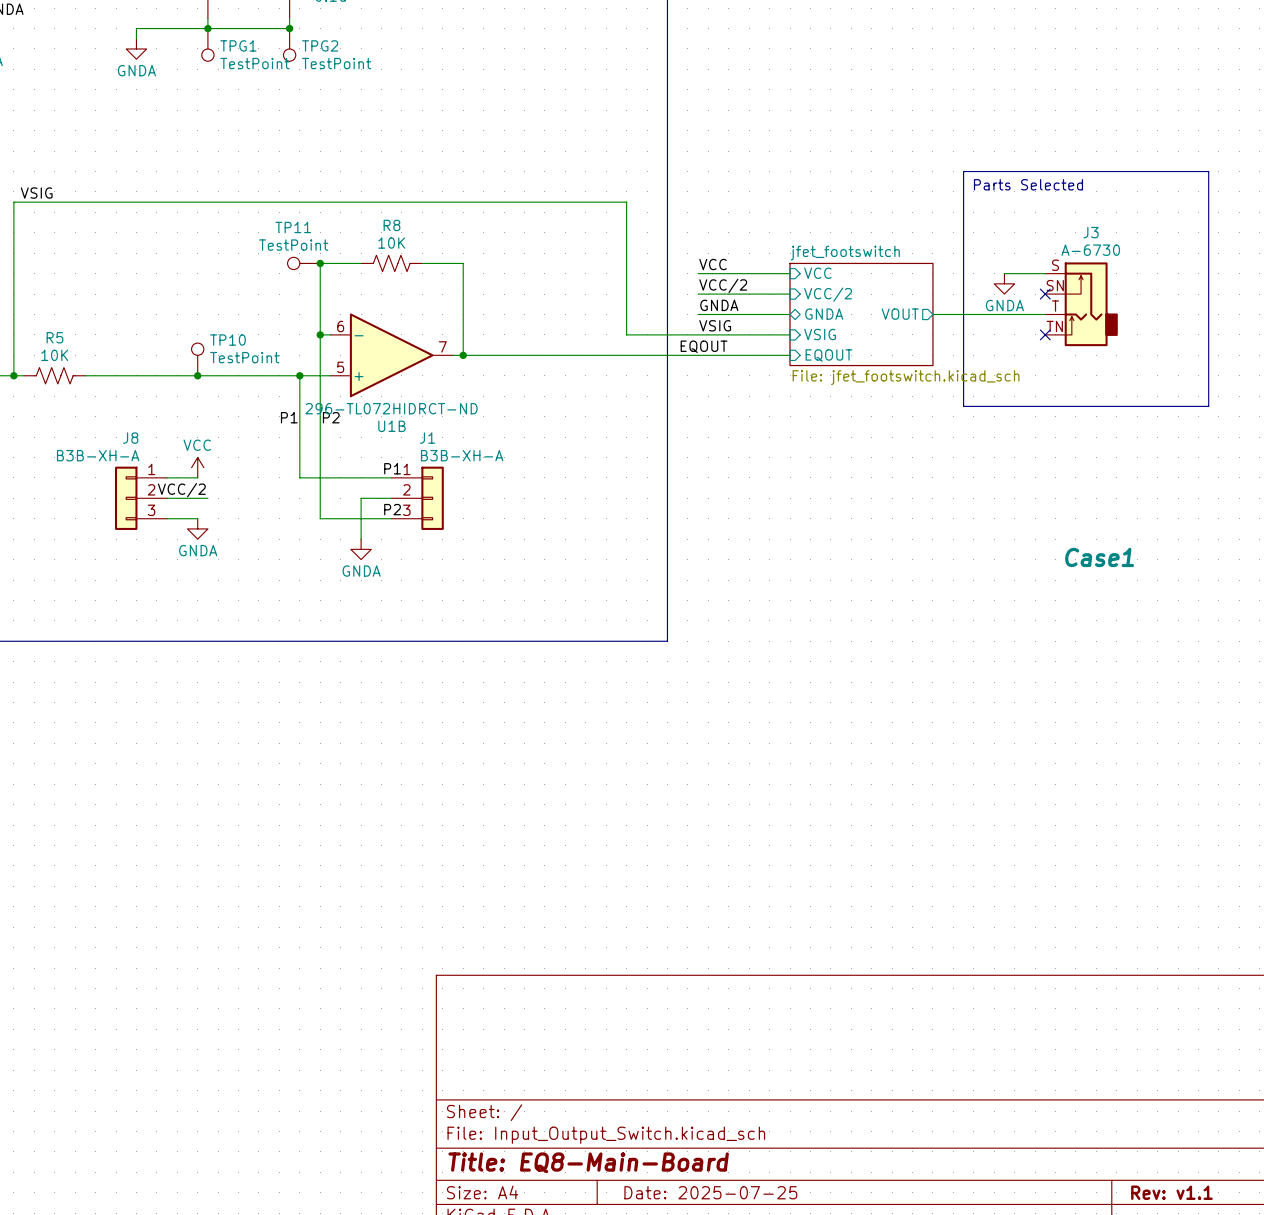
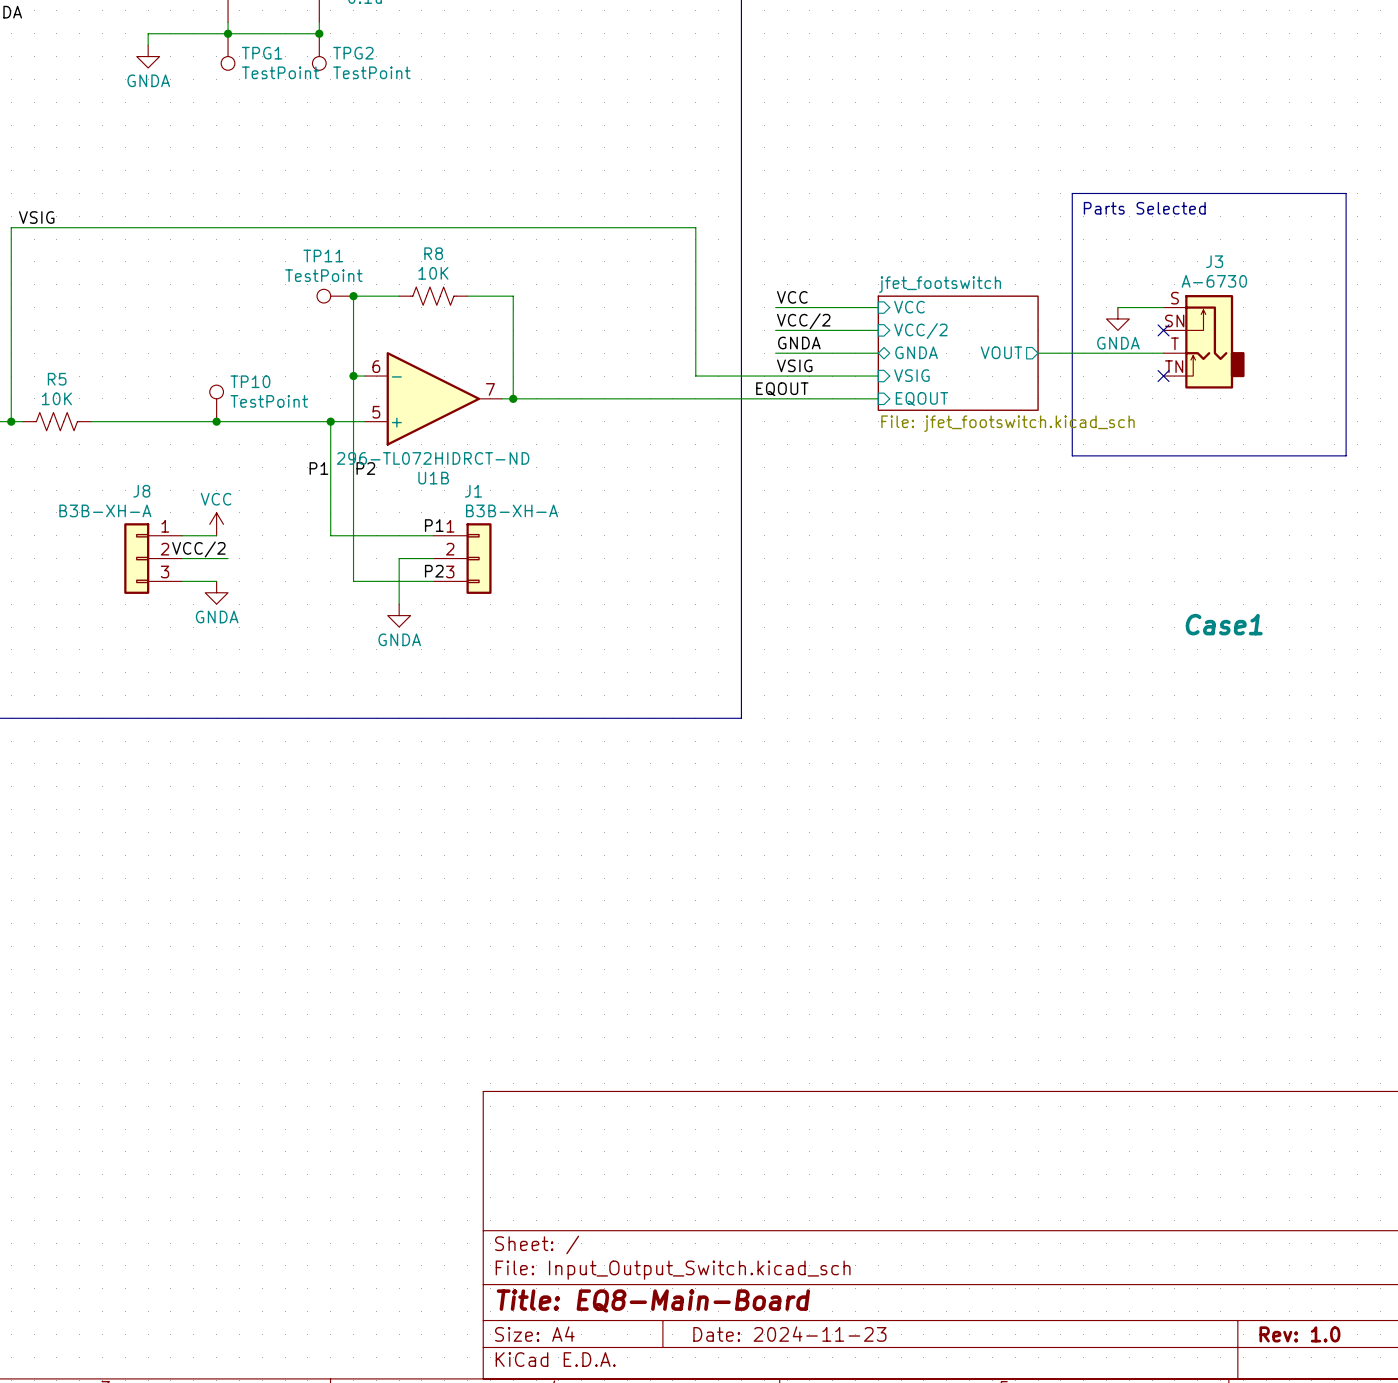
title block: Date: 2025-07-25 (710, 1192) -> Date: 2024-11-23 (789, 1334)
title block: Rev: v1.1 (1171, 1192) -> Rev: 1.0 (1299, 1334)

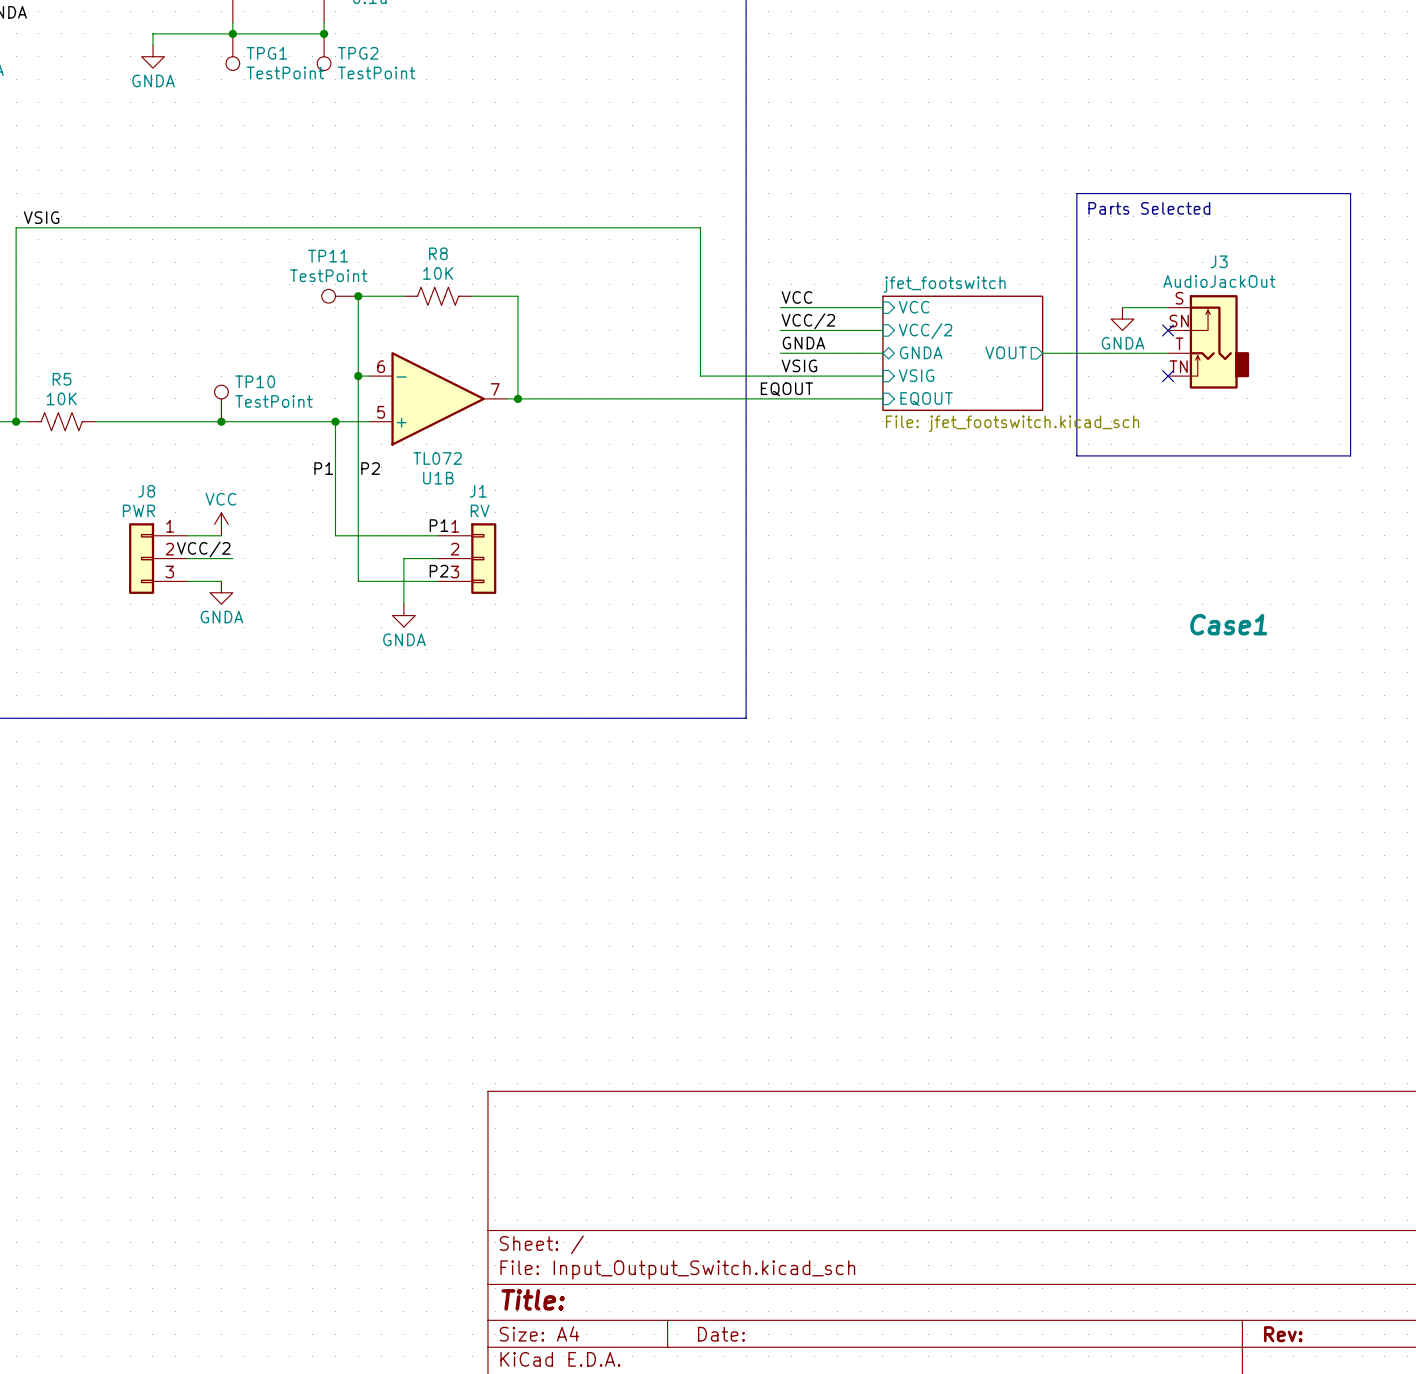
J3 value: A-6730 (1214, 281) -> AudioJackOut (1219, 281)
U1B value: 296-TL072HIDRCT-ND (433, 458) -> TL072 (437, 458)
J8 value: B3B-XH-A (105, 510) -> PWR (139, 510)
J1 value: B3B-XH-A (512, 510) -> RV (480, 510)
title block: Title: EQ8-Main-Board (653, 1300) -> Title: (533, 1299)
title block: Date: 2024-11-23 (789, 1334) -> Date: (721, 1334)
title block: Rev: 1.0 (1299, 1334) -> Rev: (1283, 1334)

